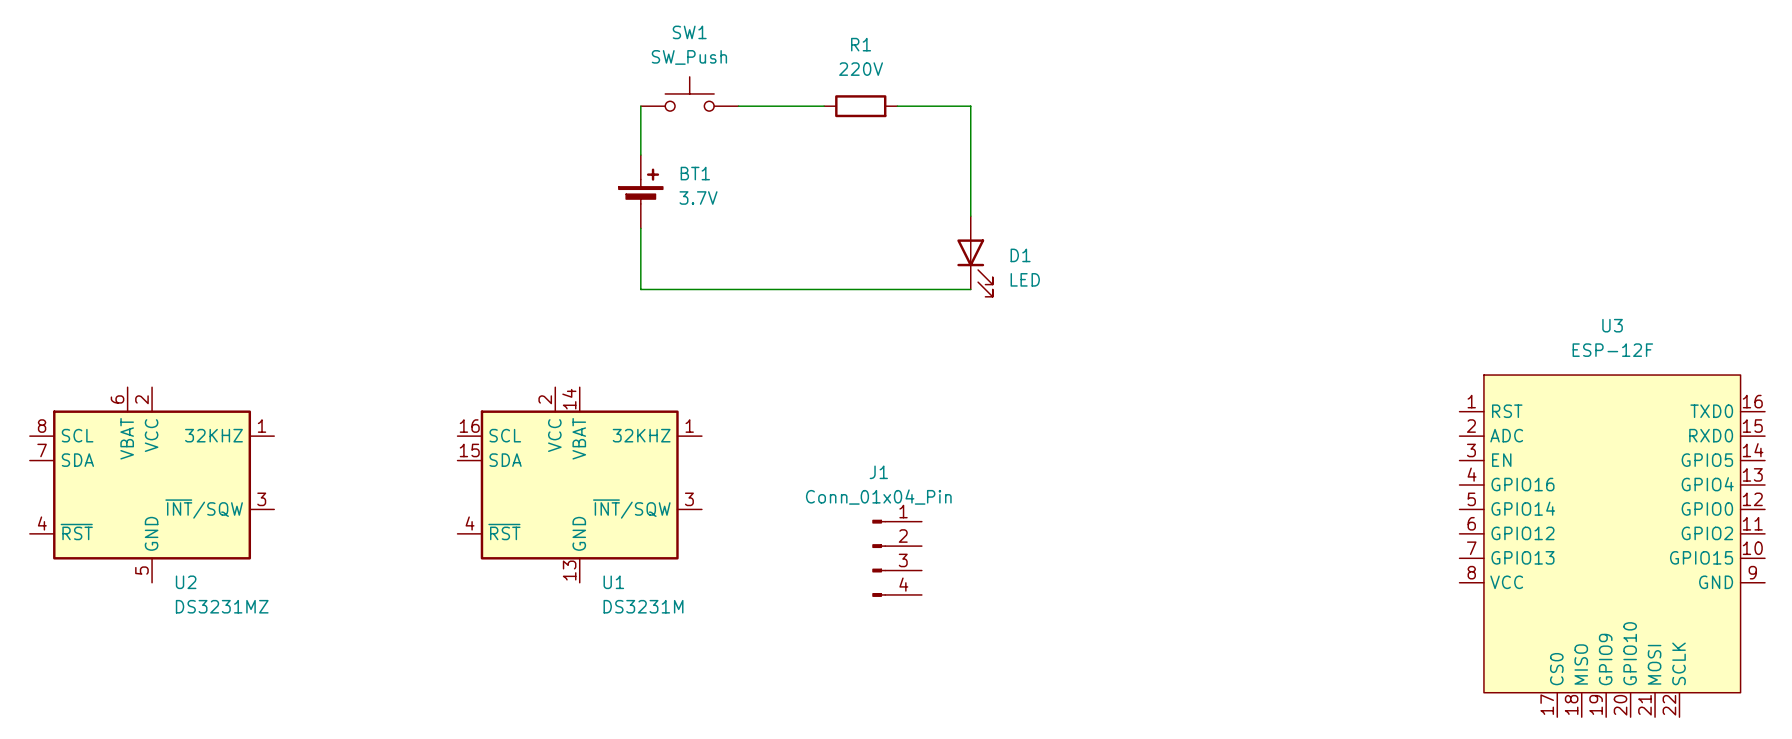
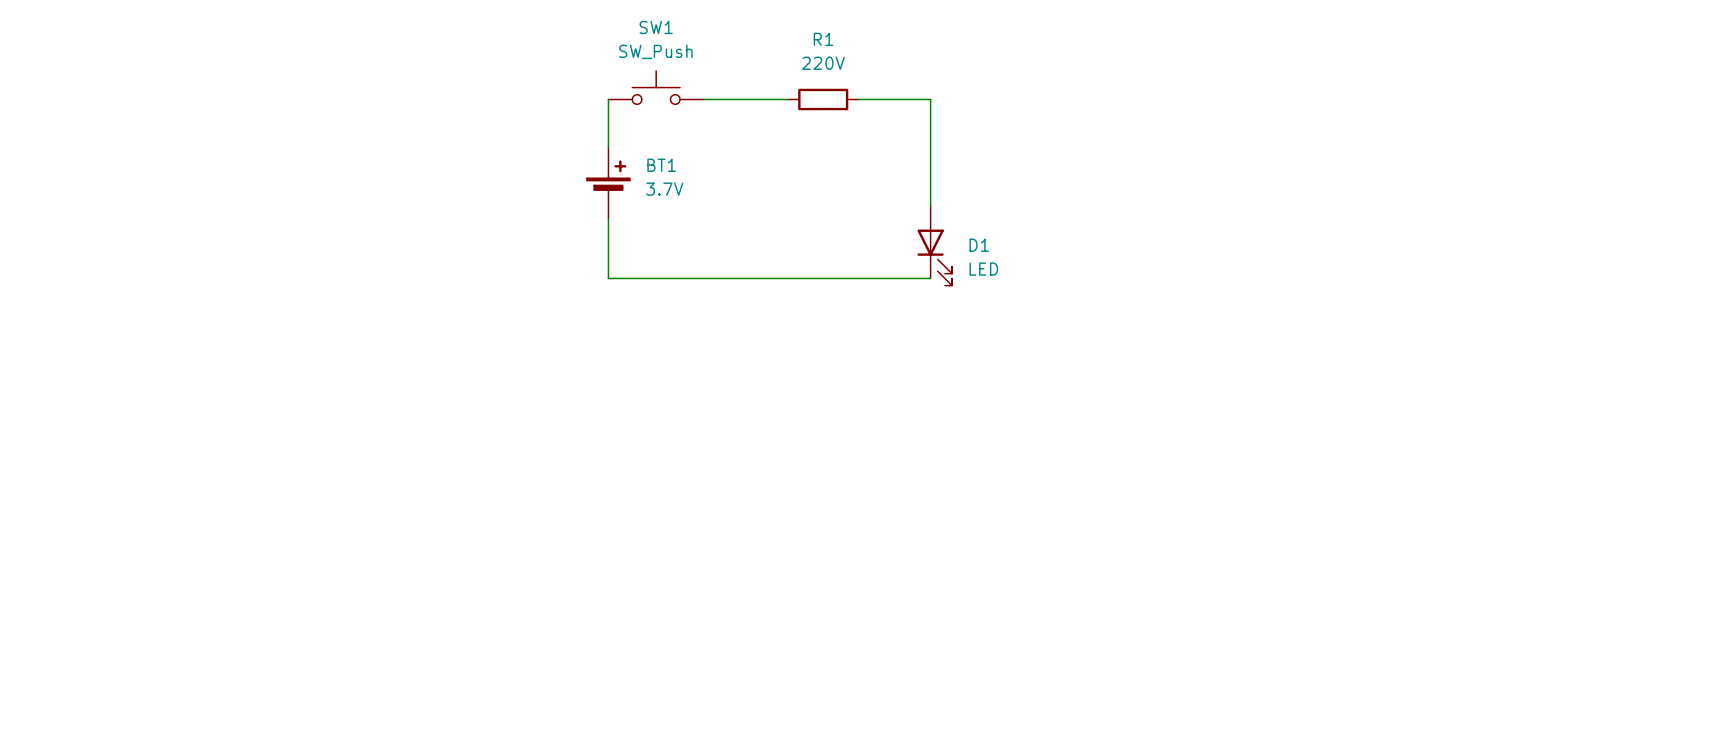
U2: DS3231MZ (152, 484) -> none
U1: DS3231M (579, 484) -> none
U3: ESP-12F (1612, 546) -> none
J1: Conn_01x04_Pin (897, 558) -> none

